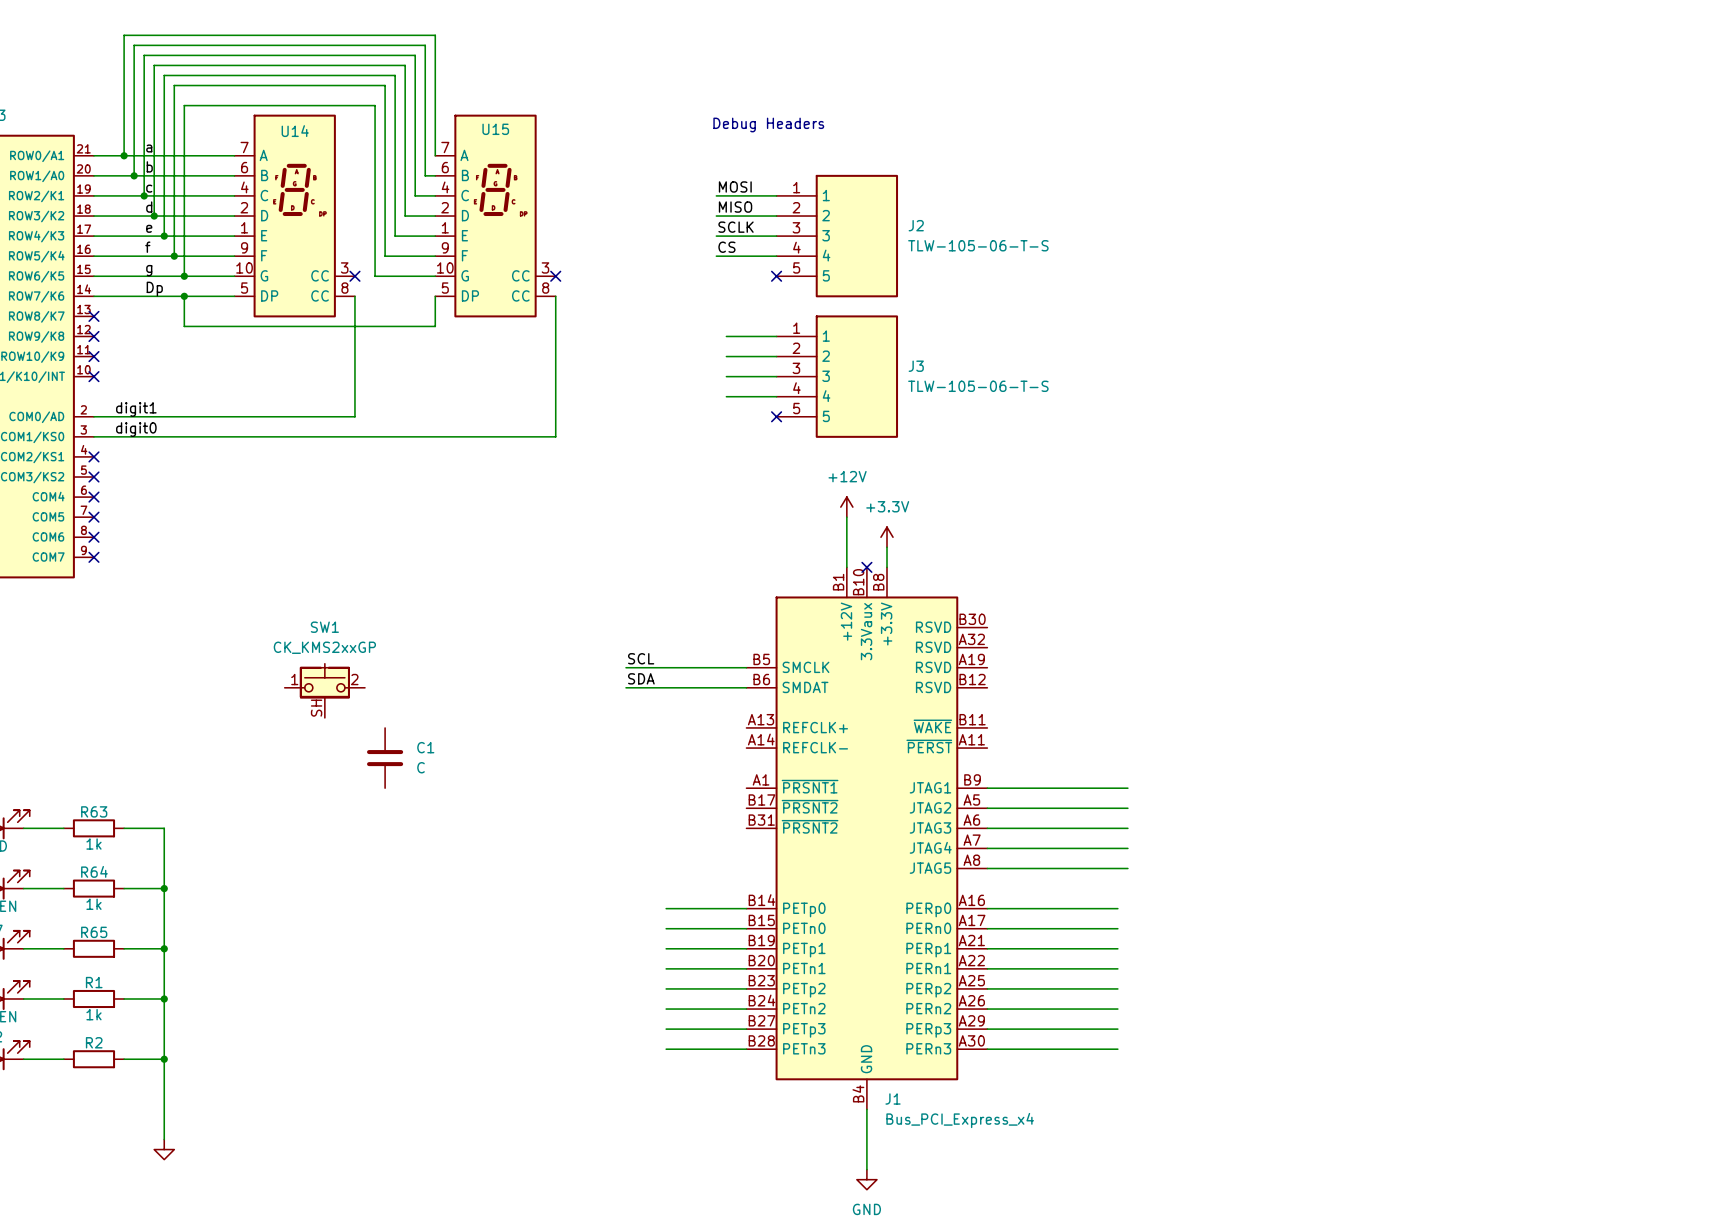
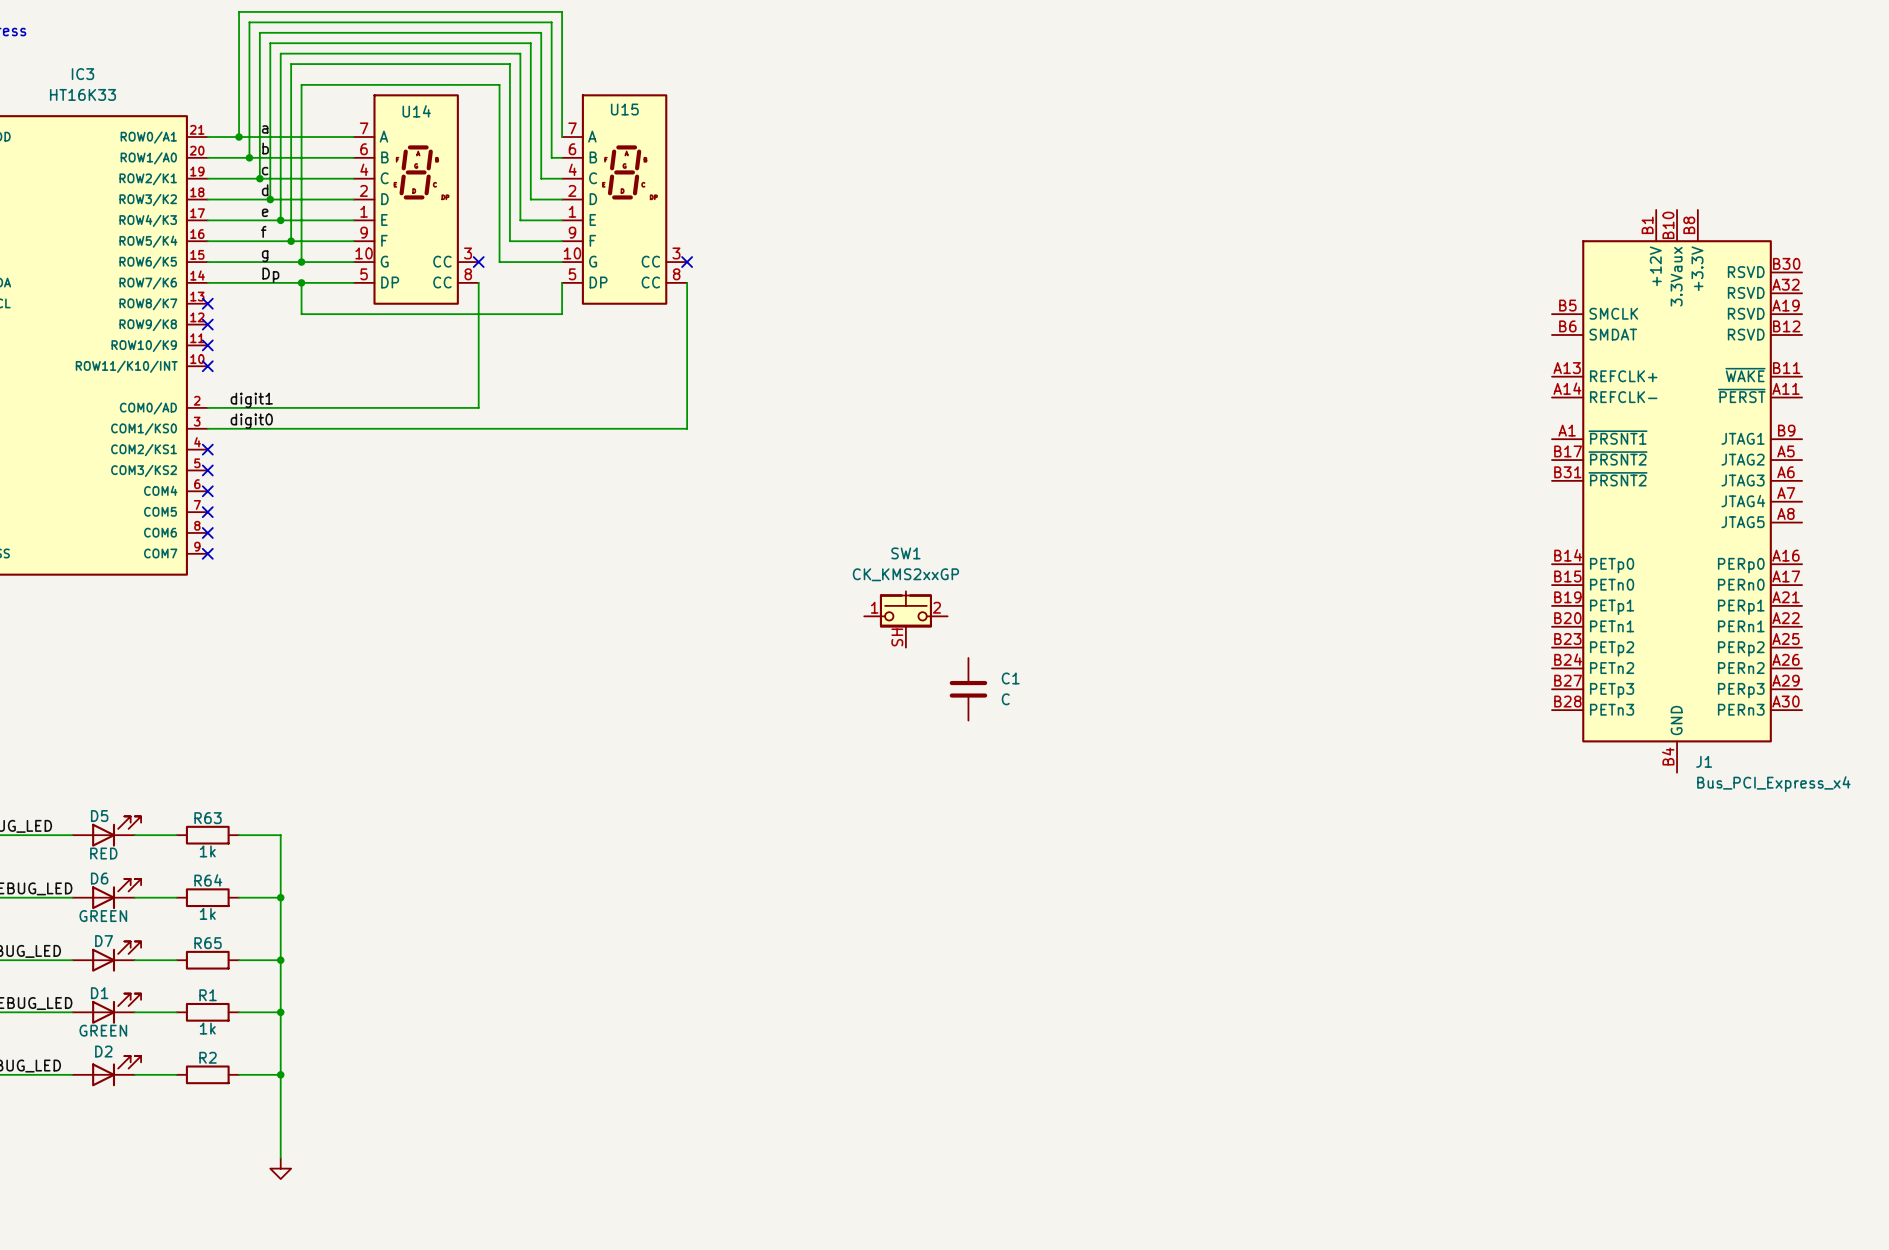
text: Debug Headers (768, 124) -> none
label: MOSI (735, 186) -> none
wire: (716, 195) (776, 195) -> none
label: MISO (735, 207) -> none
wire: (716, 216) (776, 216) -> none
label: SCLK (736, 227) -> none
wire: (716, 236) (776, 236) -> none
J2: TLW-105-06-T-S (837, 236) -> none
label: CS (726, 247) -> none
wire: (716, 256) (776, 256) -> none
no-connect mark: (776, 276) -> none
wire: (726, 336) (776, 336) -> none
wire: (726, 356) (776, 356) -> none
wire: (726, 376) (776, 376) -> none
J3: TLW-105-06-T-S (837, 376) -> none
wire: (726, 396) (776, 396) -> none
no-connect mark: (776, 416) -> none
power symbol: +12V (846, 507) -> none
wire: (846, 517) (846, 567) -> none
power symbol: +3.3V (886, 537) -> none
wire: (886, 547) (886, 567) -> none
no-connect mark: (866, 567) -> none
label: SCL (641, 658) -> none
wire: (626, 667) (746, 667) -> none
label: SDA (641, 678) -> none
wire: (626, 687) (746, 687) -> none
SW1 position: (324, 690) -> (905, 619)
C1 position: (385, 758) -> (968, 689)
wire: (987, 788) (1127, 788) -> none
wire: (987, 808) (1127, 808) -> none
wire: (987, 828) (1127, 828) -> none
J1 position: (866, 838) -> (1677, 491)
wire: (987, 848) (1127, 848) -> none
wire: (987, 868) (1127, 868) -> none
wire: (666, 908) (746, 908) -> none
wire: (987, 908) (1117, 908) -> none
wire: (666, 928) (746, 928) -> none
wire: (987, 928) (1117, 928) -> none
wire: (666, 948) (746, 948) -> none
wire: (987, 948) (1117, 948) -> none
wire: (666, 968) (746, 968) -> none
wire: (987, 968) (1117, 968) -> none
wire: (666, 988) (746, 988) -> none
wire: (987, 988) (1117, 988) -> none
wire: (666, 1009) (746, 1009) -> none
wire: (987, 1009) (1117, 1009) -> none
wire: (666, 1029) (746, 1029) -> none
wire: (987, 1029) (1117, 1029) -> none
wire: (666, 1049) (746, 1049) -> none
wire: (987, 1049) (1117, 1049) -> none
wire: (866, 1109) (866, 1169) -> none
power symbol: GND (866, 1179) -> none

